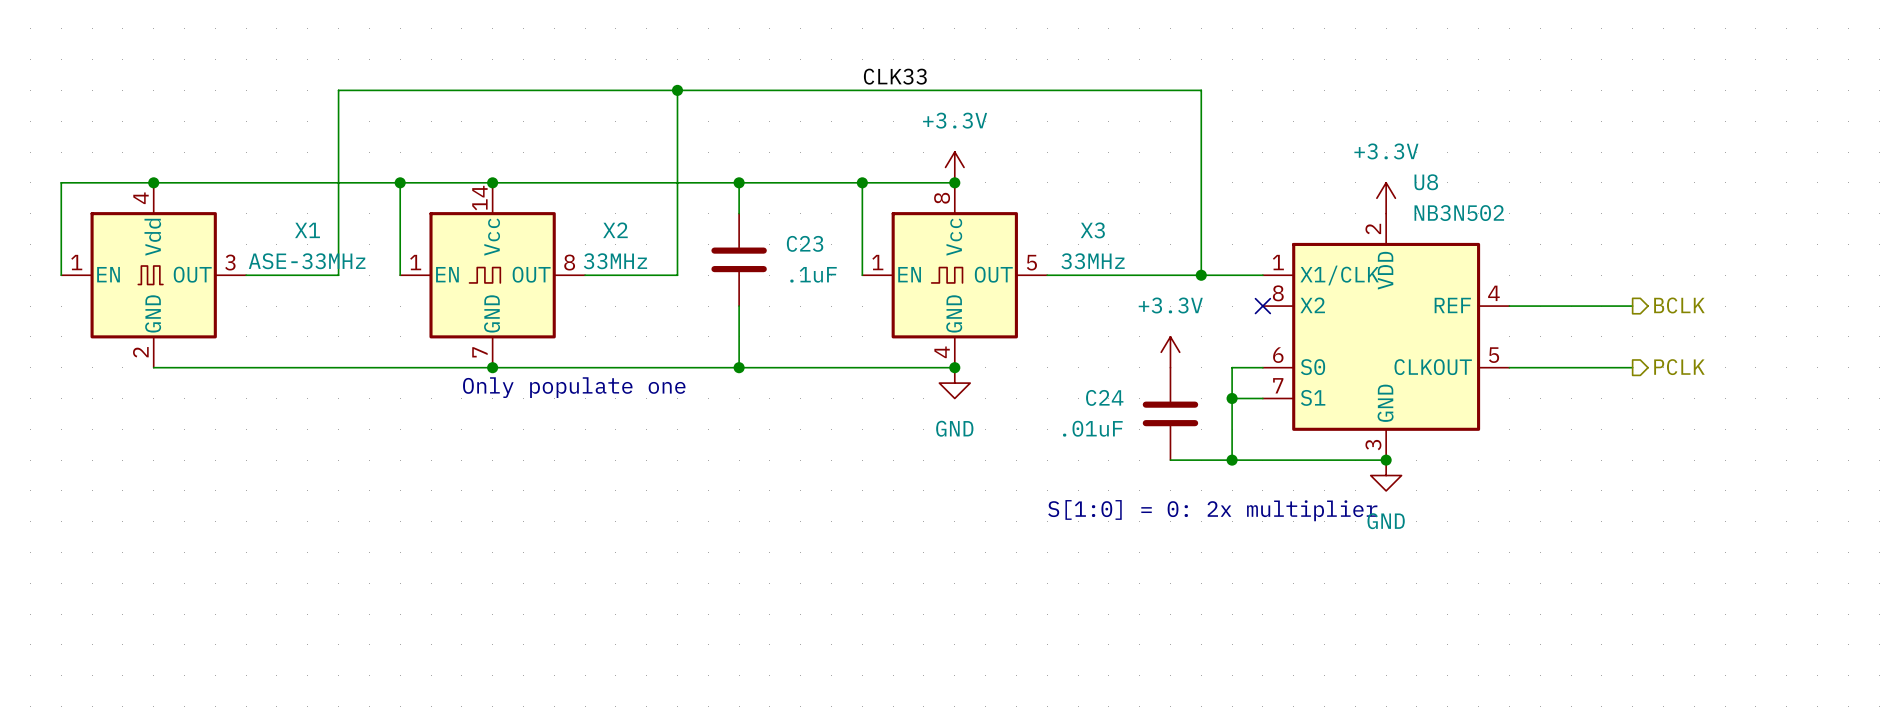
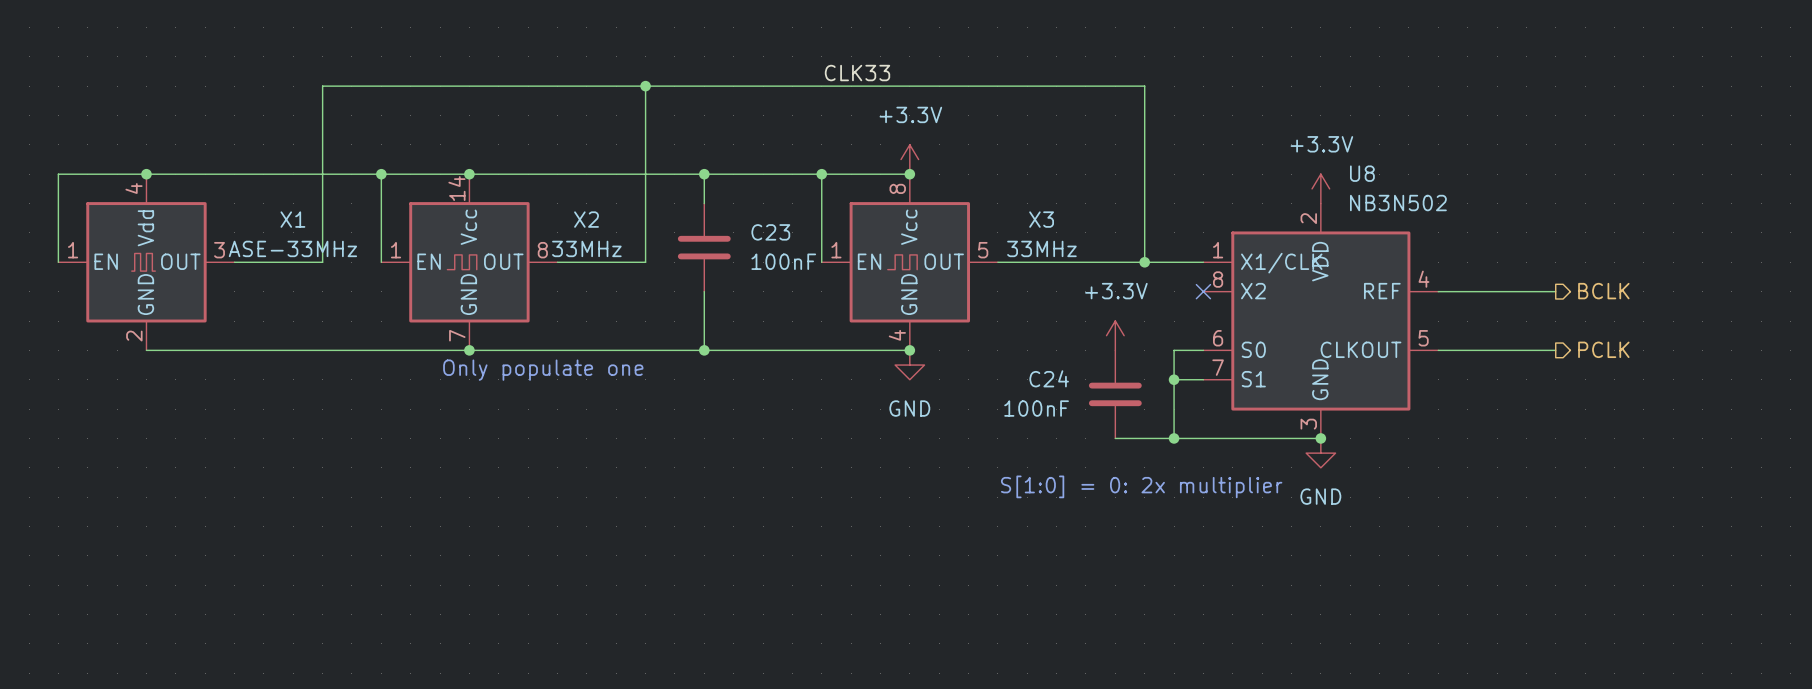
C23 value: .1uF (813, 274) -> 100nF (783, 261)
C24 value: .01uF (1092, 428) -> 100nF (1036, 408)

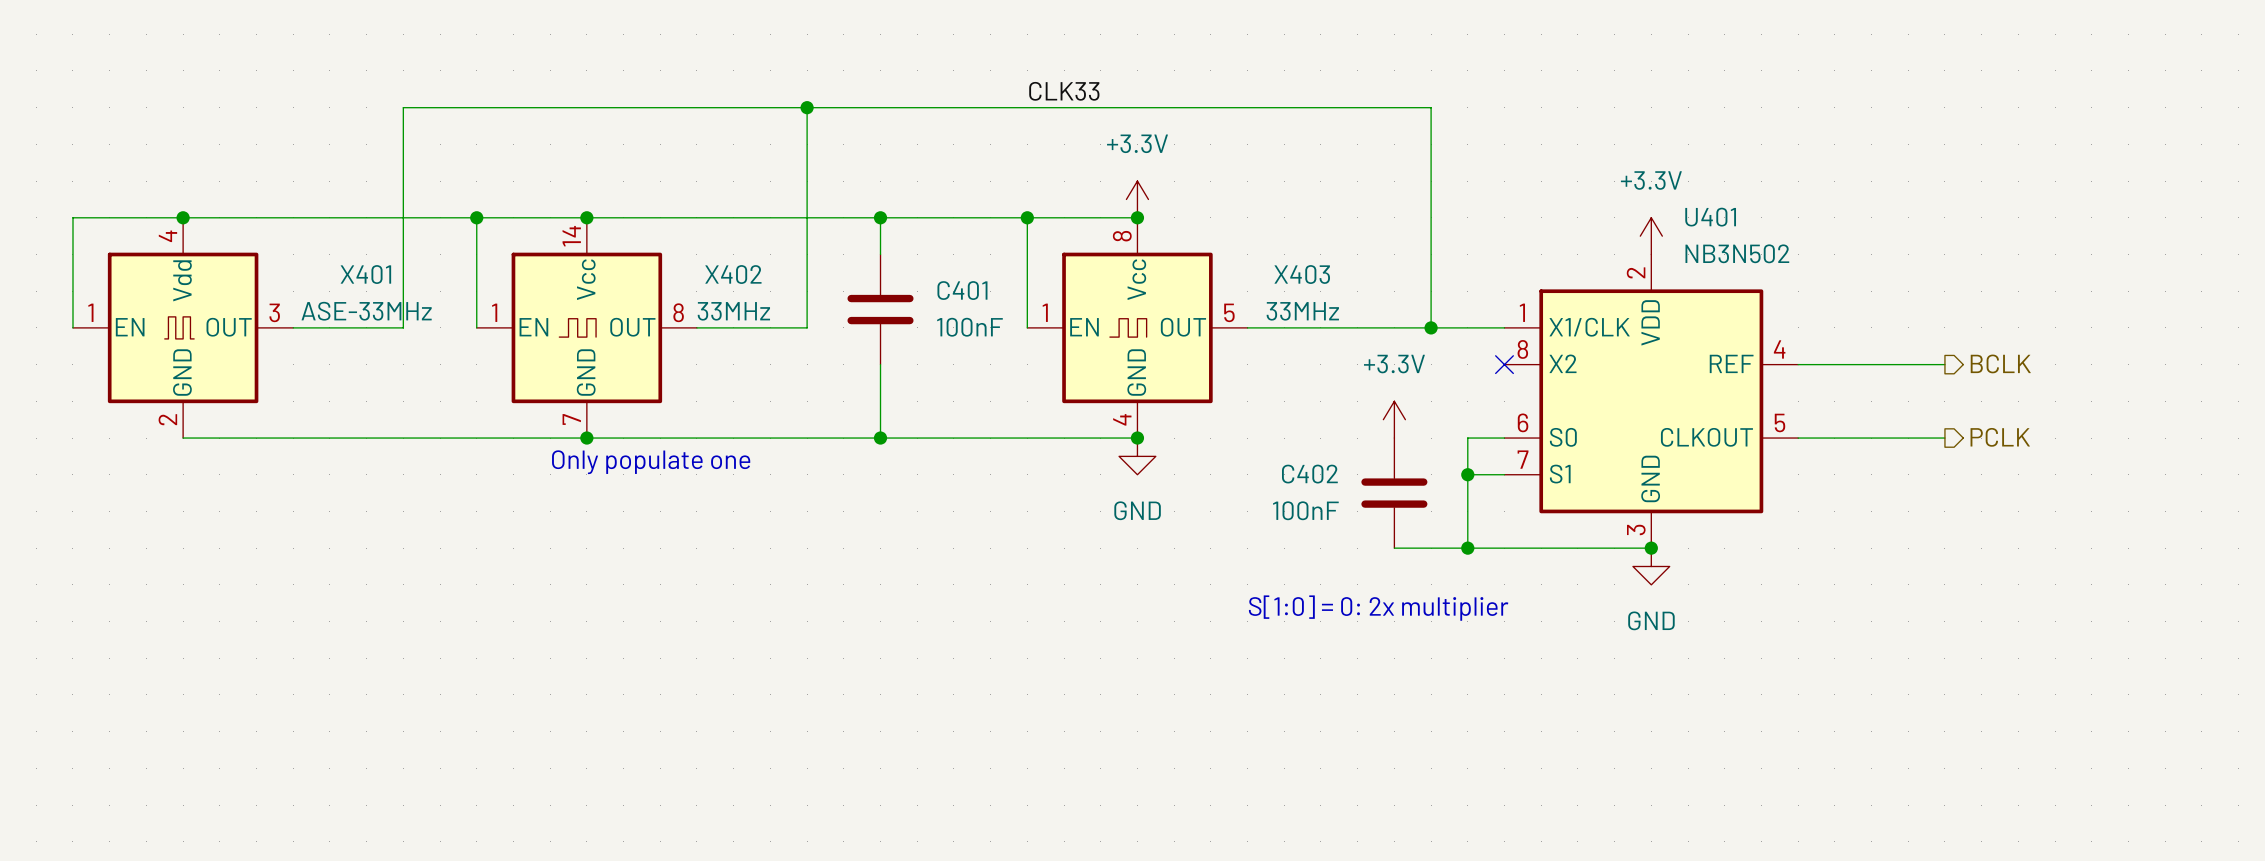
U8 name: U8 (1362, 173) -> U401 (1710, 217)
X1 name: X1 (292, 219) -> X401 (365, 274)
X2 name: X2 (586, 219) -> X402 (733, 274)
X3 name: X3 (1041, 219) -> X403 (1302, 274)
C23 name: C23 (770, 232) -> C401 (962, 290)
C24 name: C24 (1049, 378) -> C402 (1309, 474)

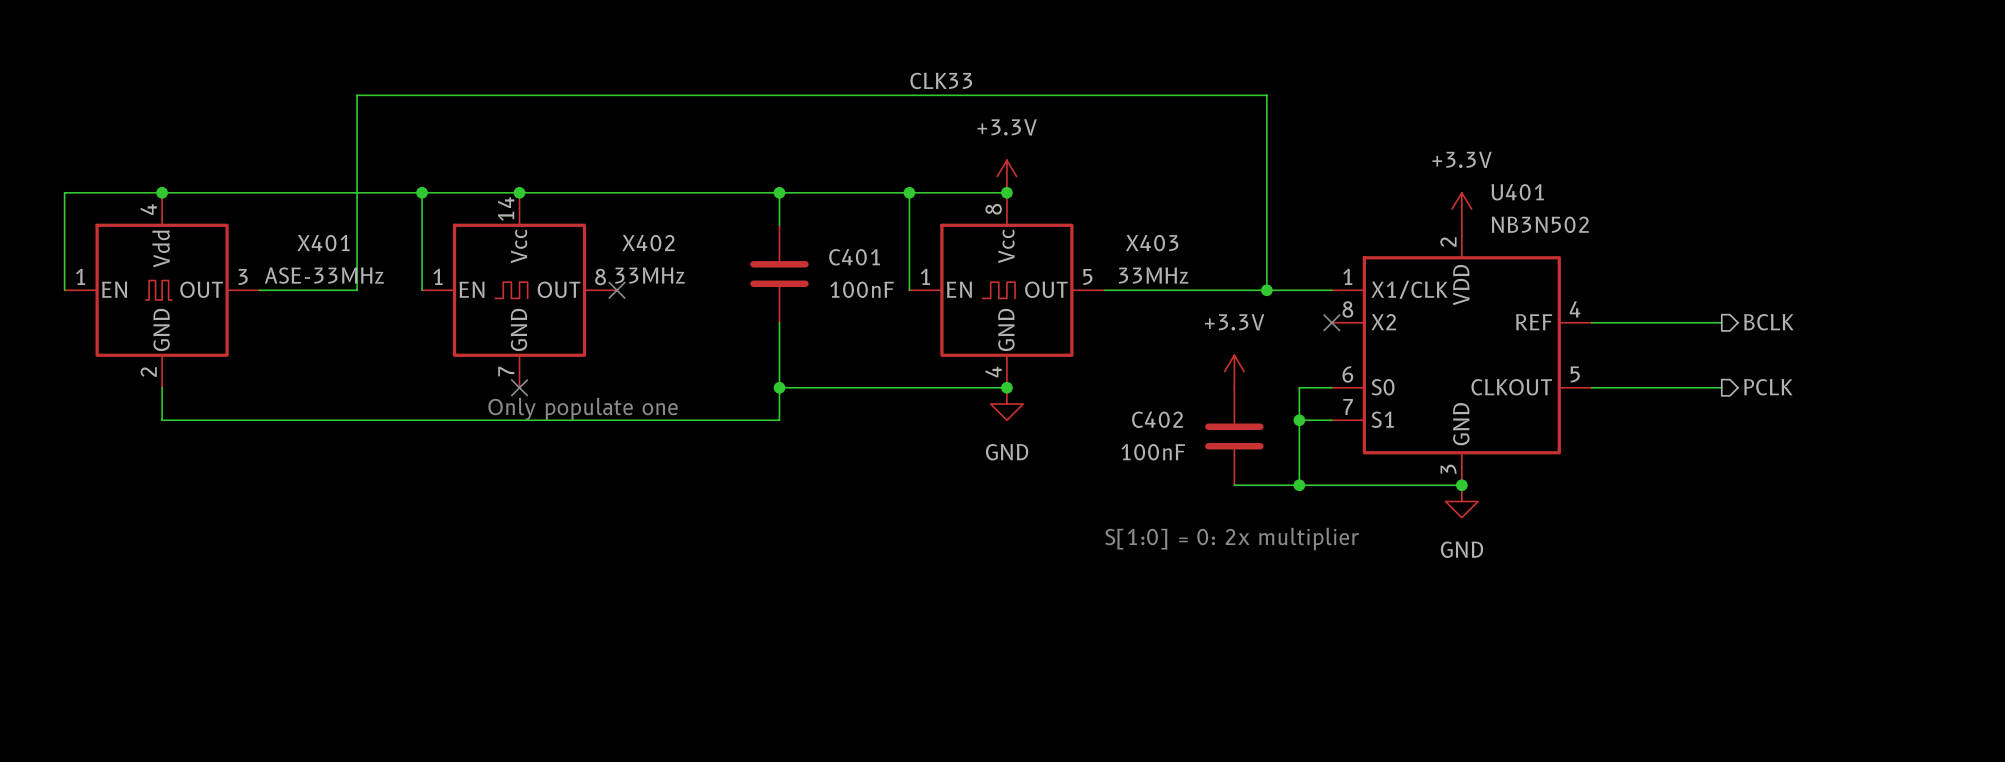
wire: (807, 107) (807, 327) (696, 327) -> none
junction: (807, 107) -> none
no-connect mark: none -> (617, 290)
wire: (183, 438) (880, 438) -> (162, 387) (162, 420) (779, 420) (779, 387)
junction: (586, 438) -> none
no-connect mark: none -> (519, 387)

